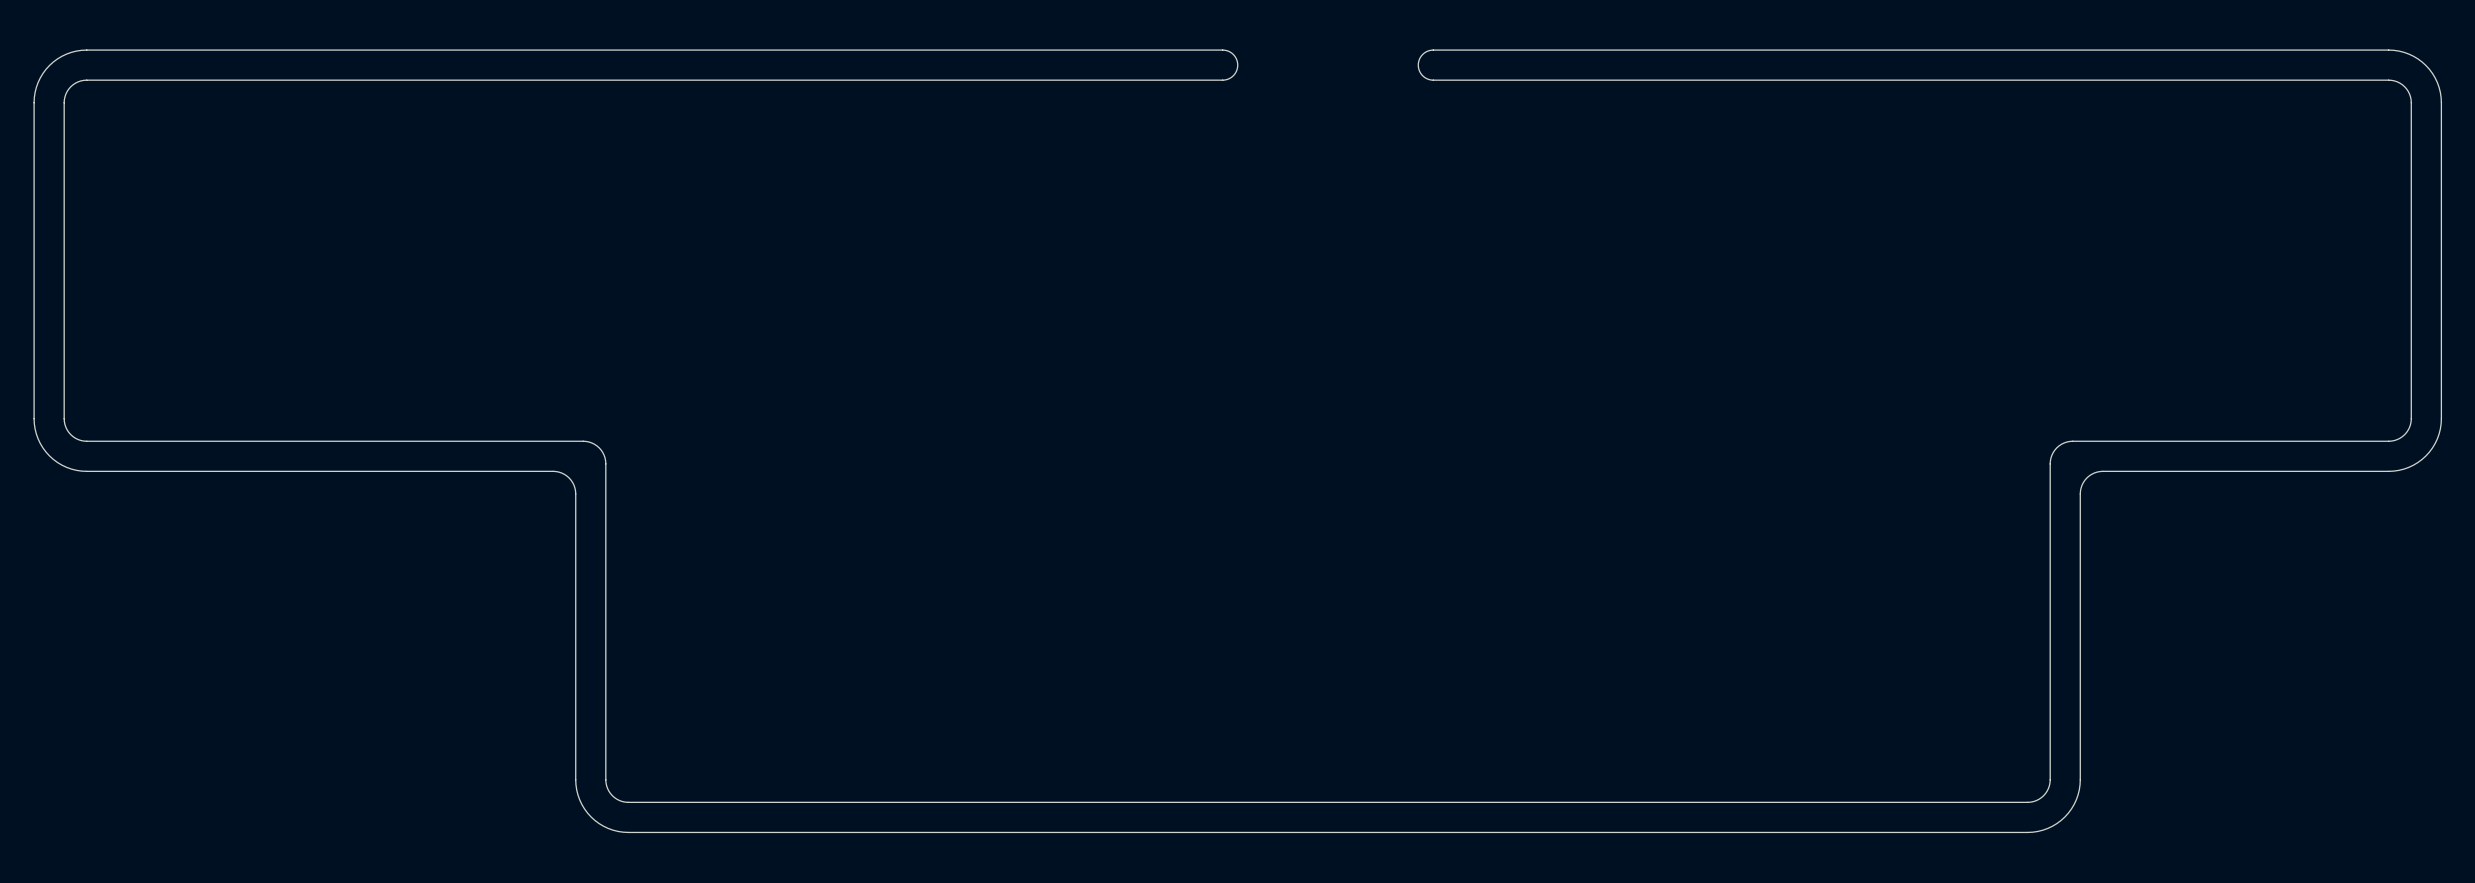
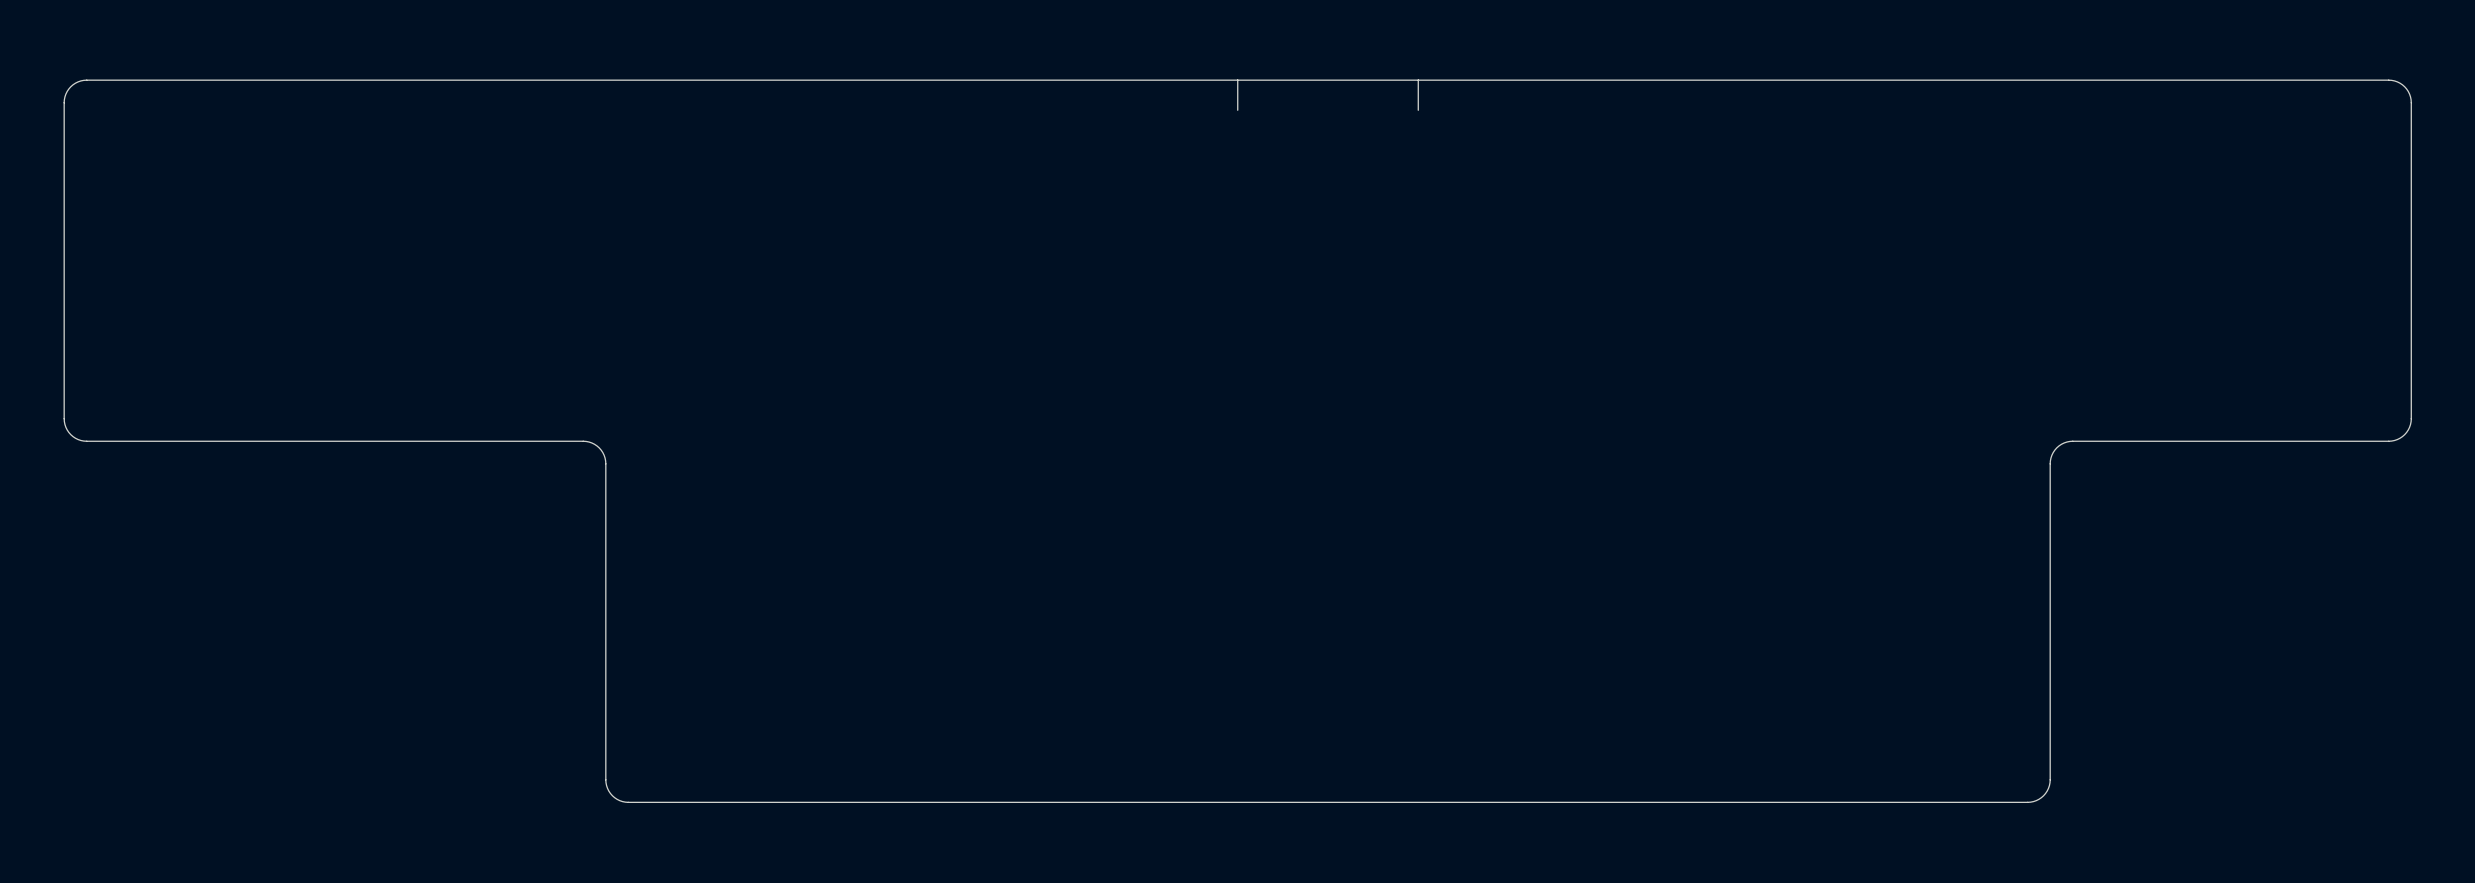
board edge: (1222, 80) (1233, 75) (1237, 65) (1233, 54) (1222, 50) (86, 50) (71, 52) (57, 58) (46, 69) (38, 82) (34, 97) (34, 418) (36, 433) (42, 447) (53, 459) (66, 467) (81, 471) (553, 471) (566, 476) (574, 485) (575, 493) (576, 790) (584, 809) (594, 820) (613, 830) (628, 832) (2037, 831) (2052, 826) (2068, 813) (2076, 799) (2080, 784) (2080, 493) (2082, 485) (2086, 477) (2094, 473) (2102, 471) (2393, 471) (2408, 467) (2422, 459) (2432, 447) (2439, 433) (2441, 418) (2441, 97) (2437, 82) (2429, 69) (2417, 58) (2404, 52) (2388, 50) (1433, 50) (1422, 54) (1418, 65) (1422, 75) (1433, 80) -> (1222, 80) (1433, 80)
board edge: none -> (1237, 80) (1237, 110)
board edge: none -> (1418, 80) (1418, 110)

